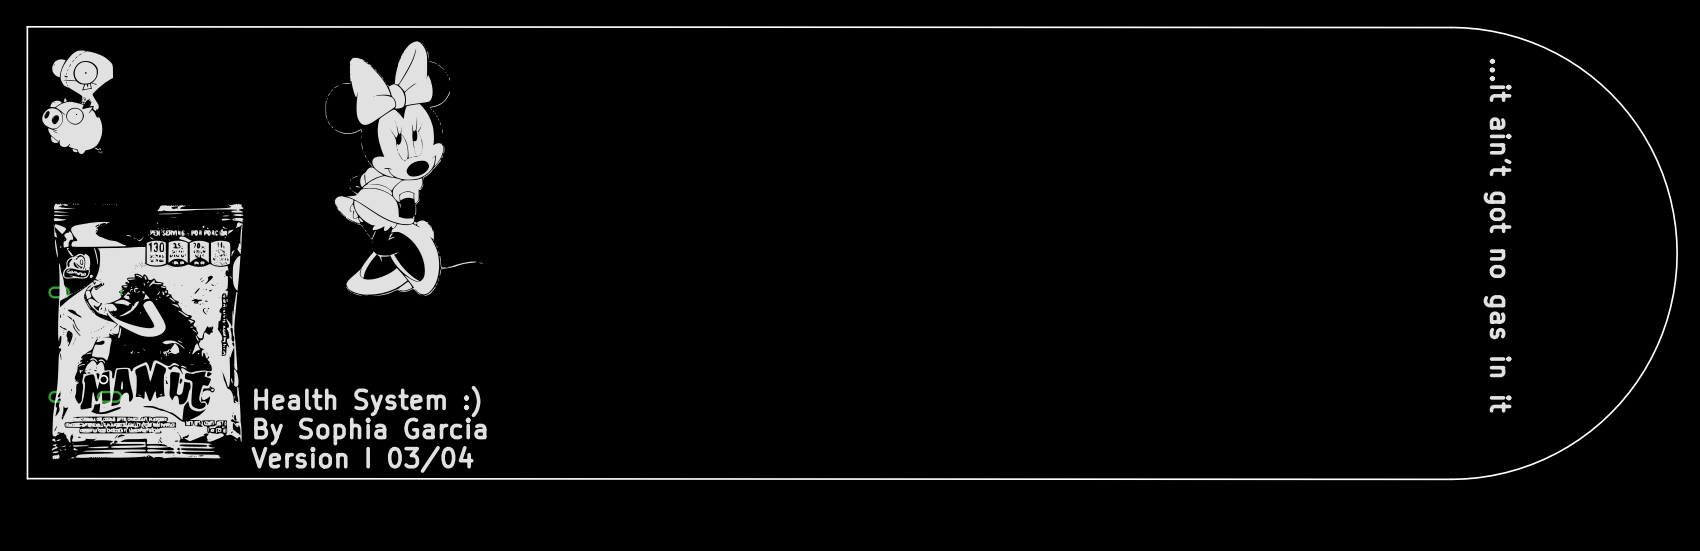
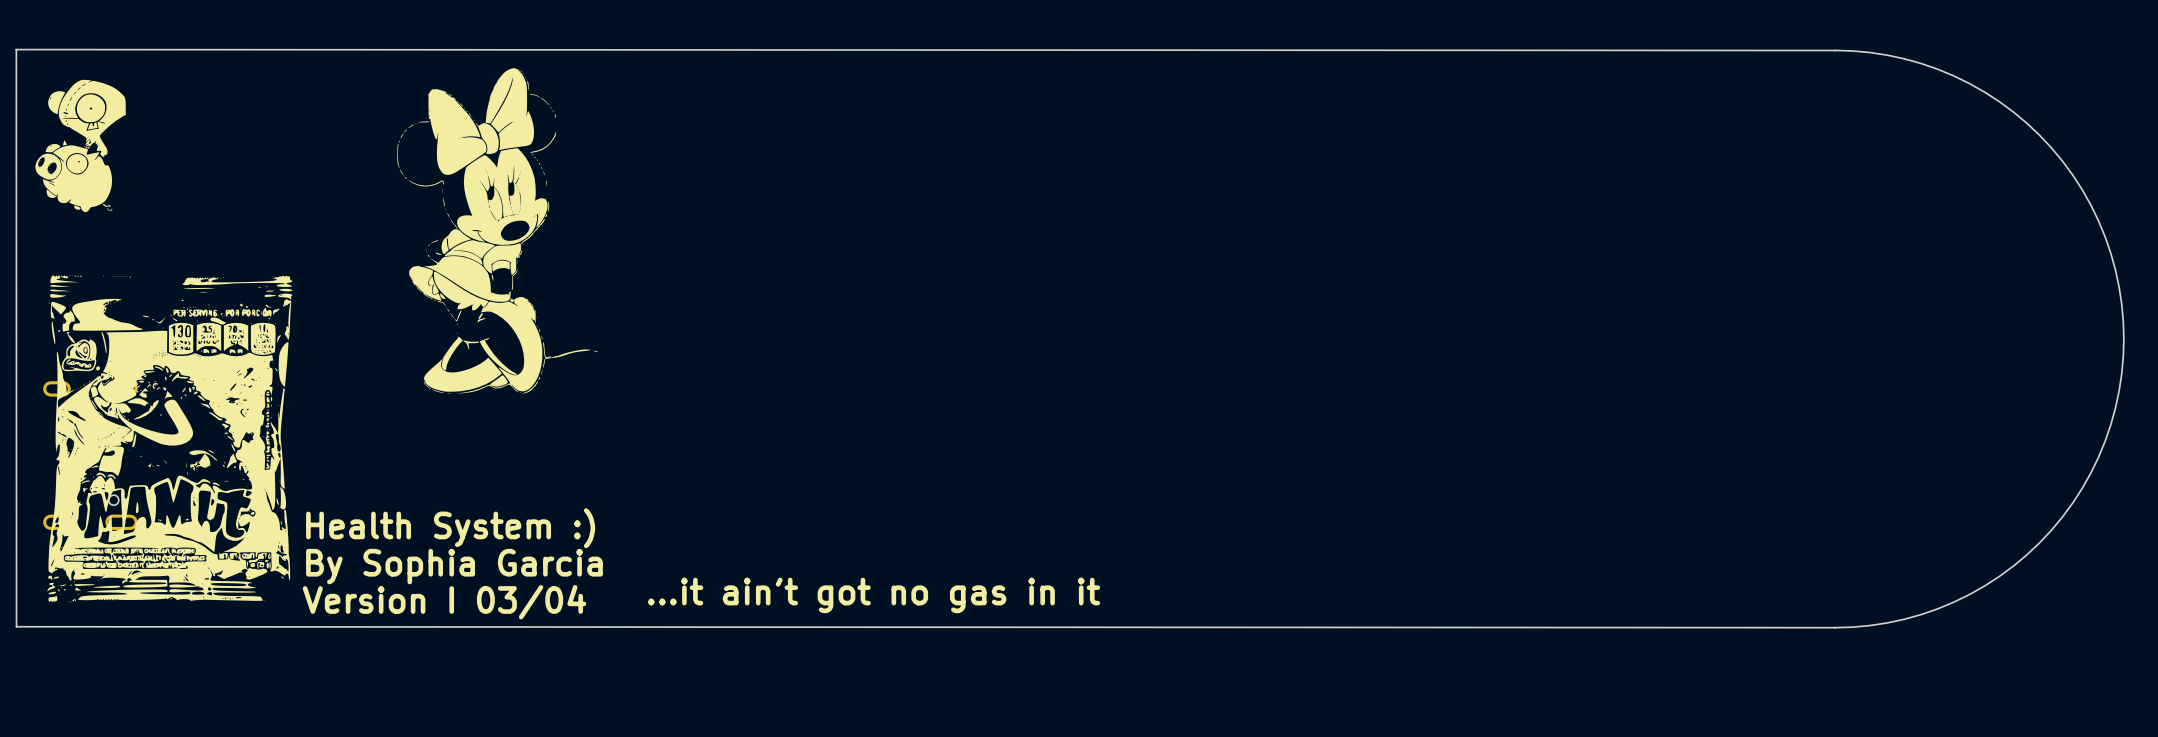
text: ...it ain't got no gas in it (1497, 235) -> none
text: none -> ...it ain't got no gas in it (873, 595)

